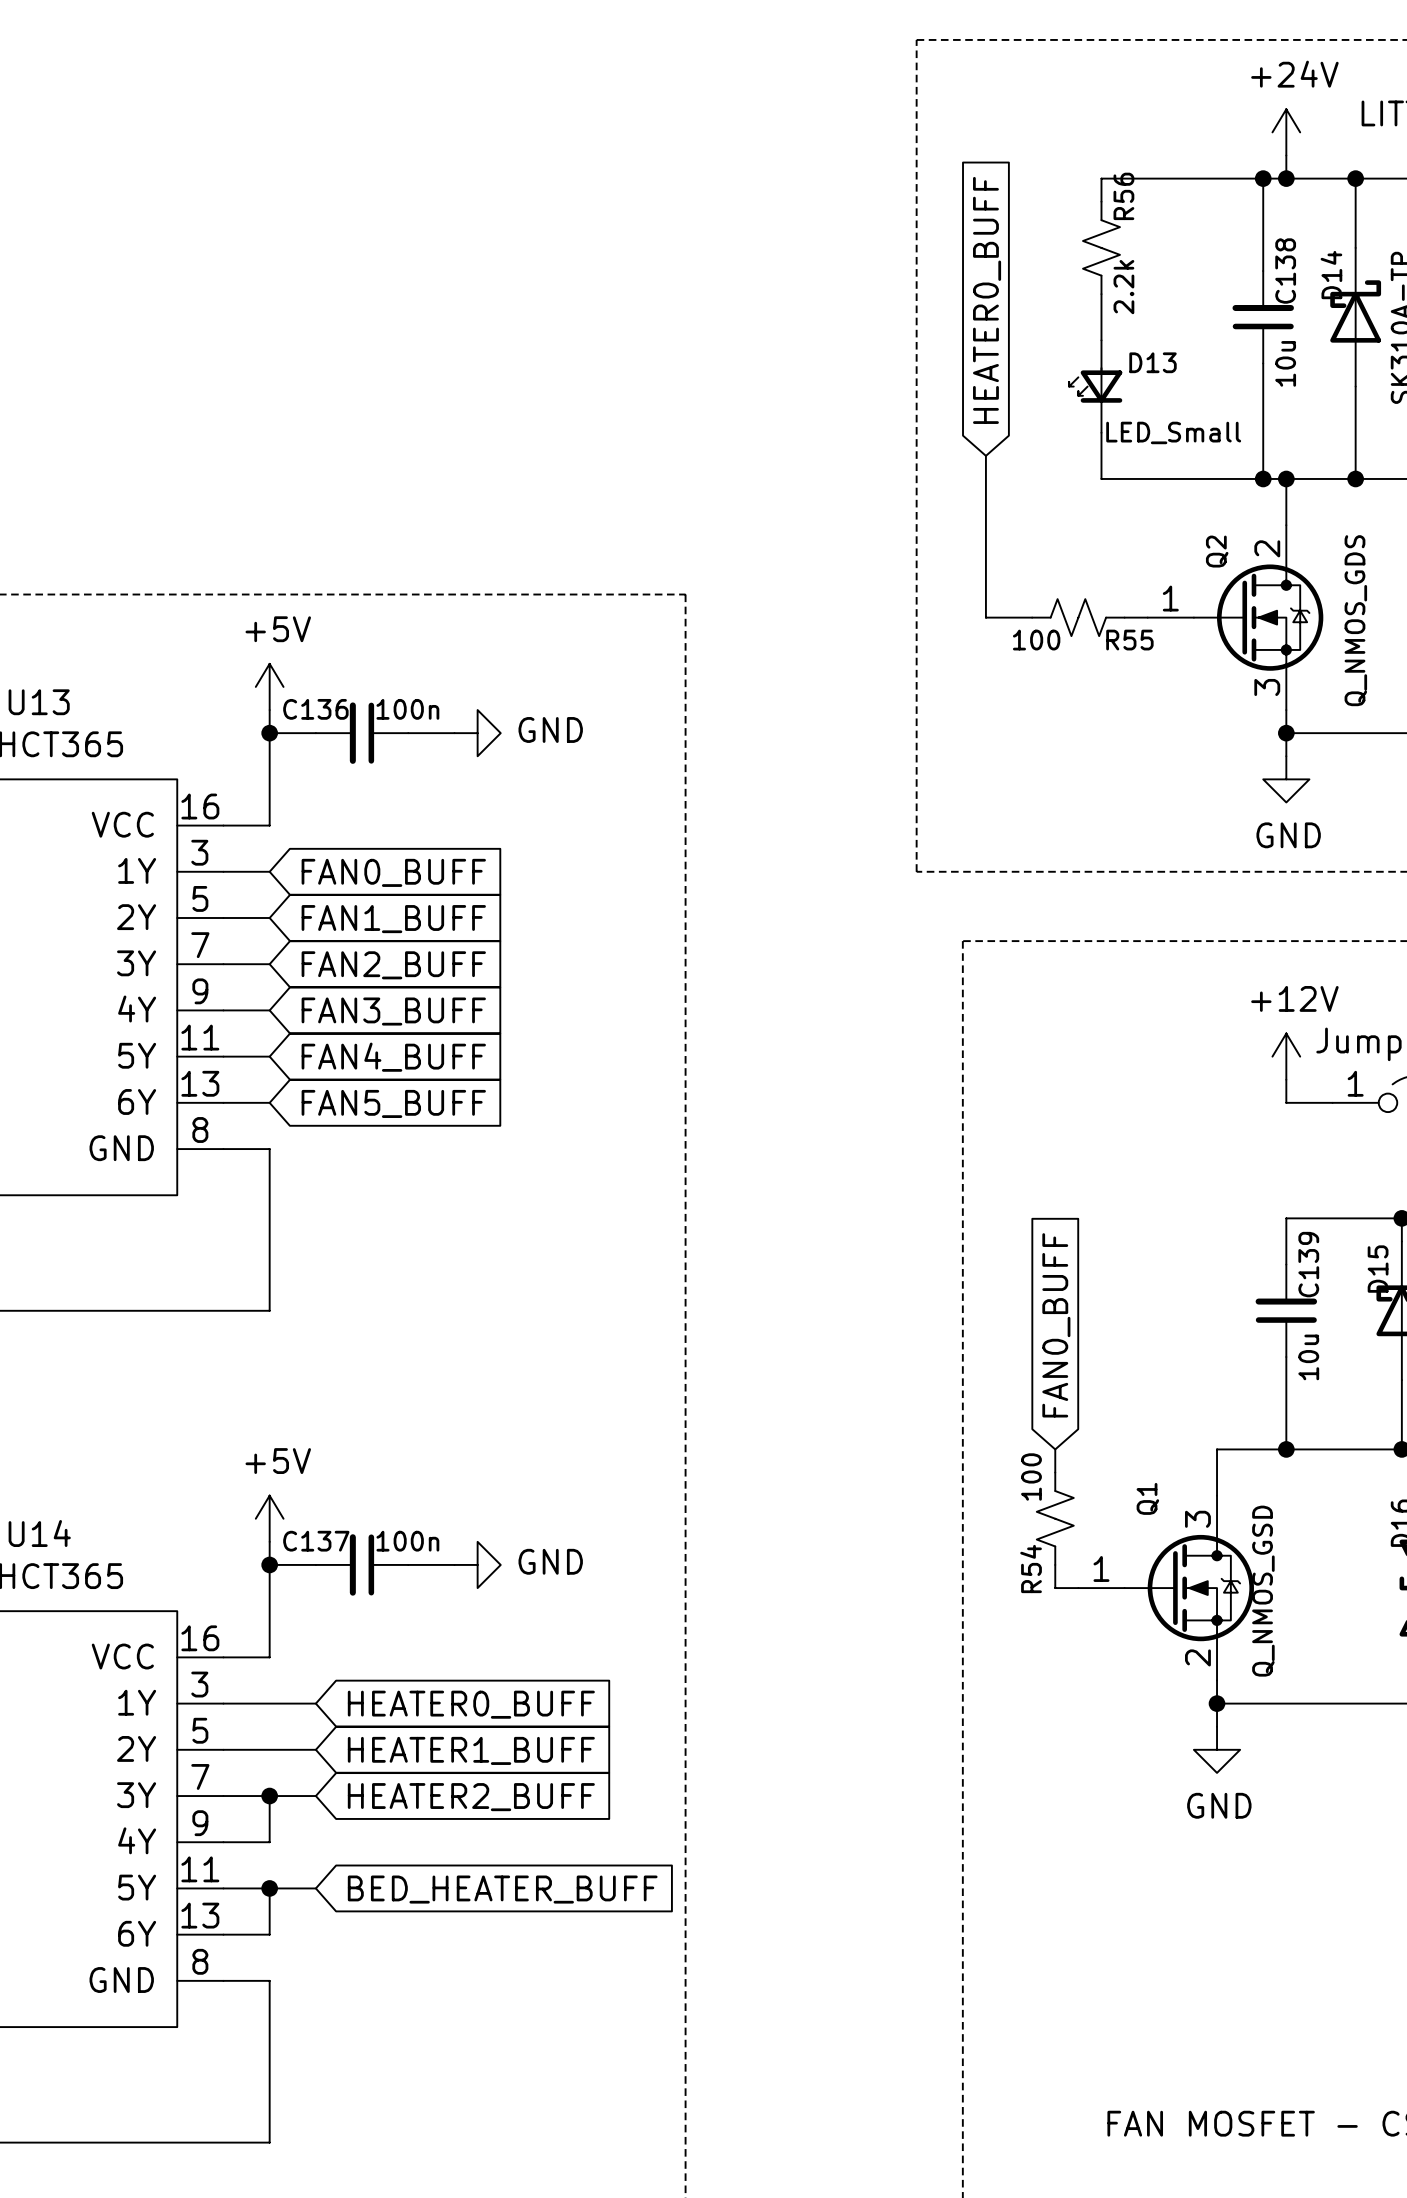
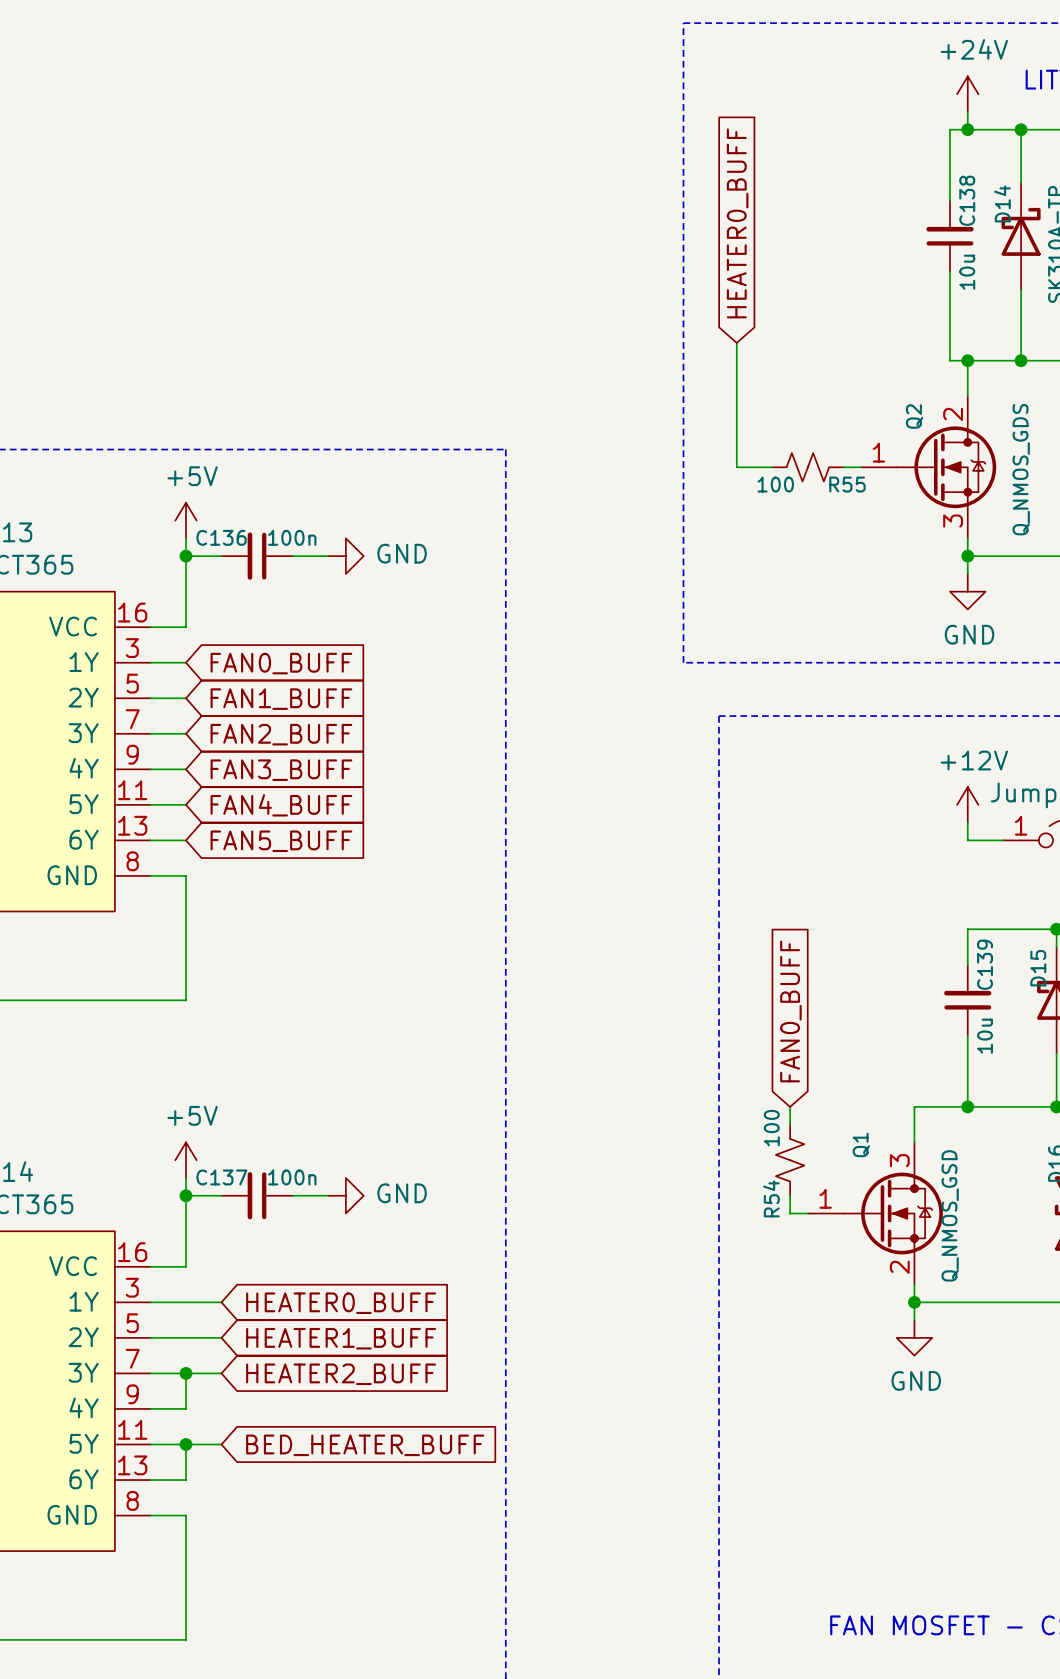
wire: (1263, 178) (1101, 178) (1101, 201) -> none
junction: (1263, 178) -> none
R56: 2.2k (1101, 247) -> none
wire: (1101, 294) (1101, 340) -> none
D13: LED_Small (1095, 386) -> none
wire: (1101, 432) (1101, 478) (1263, 478) -> none
junction: (1263, 478) -> none

